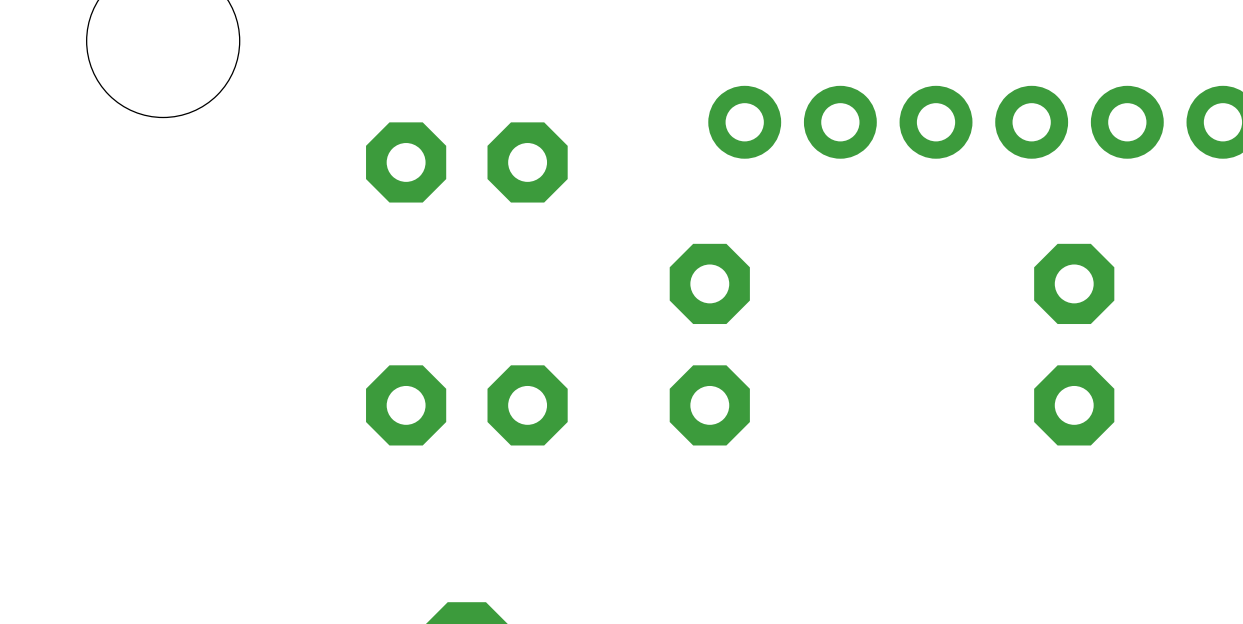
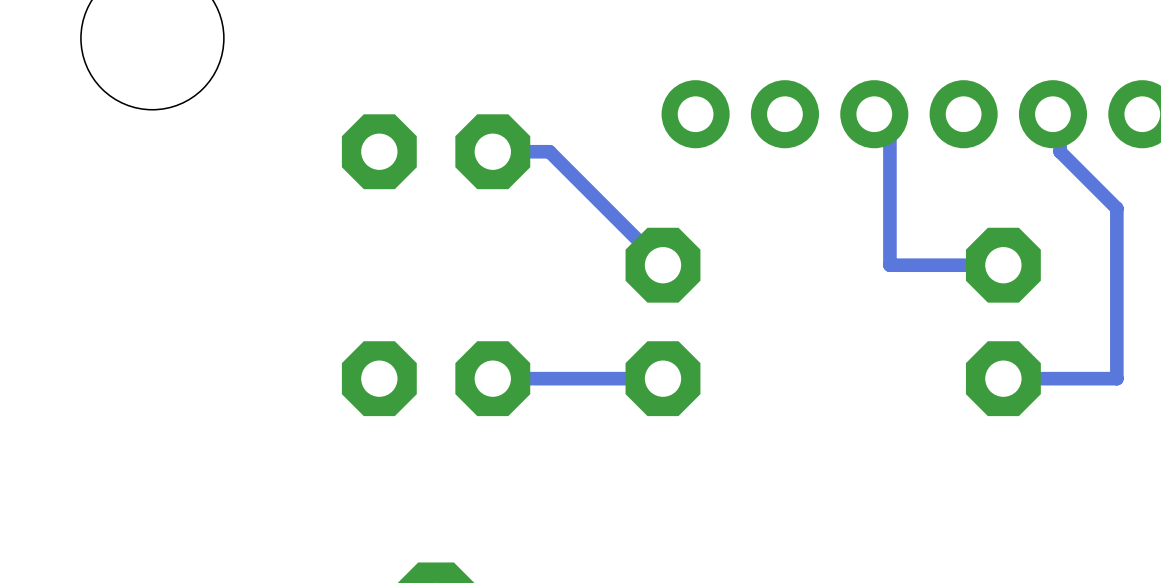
bottom track: none -> (874, 114) (889, 95) (889, 265) (1003, 265)
bottom track: none -> (1052, 114) (1060, 95) (1060, 151) (1116, 208) (1116, 378) (1003, 378)
bottom track: none -> (492, 151) (549, 151) (662, 265)
bottom track: none -> (662, 378) (492, 378)

